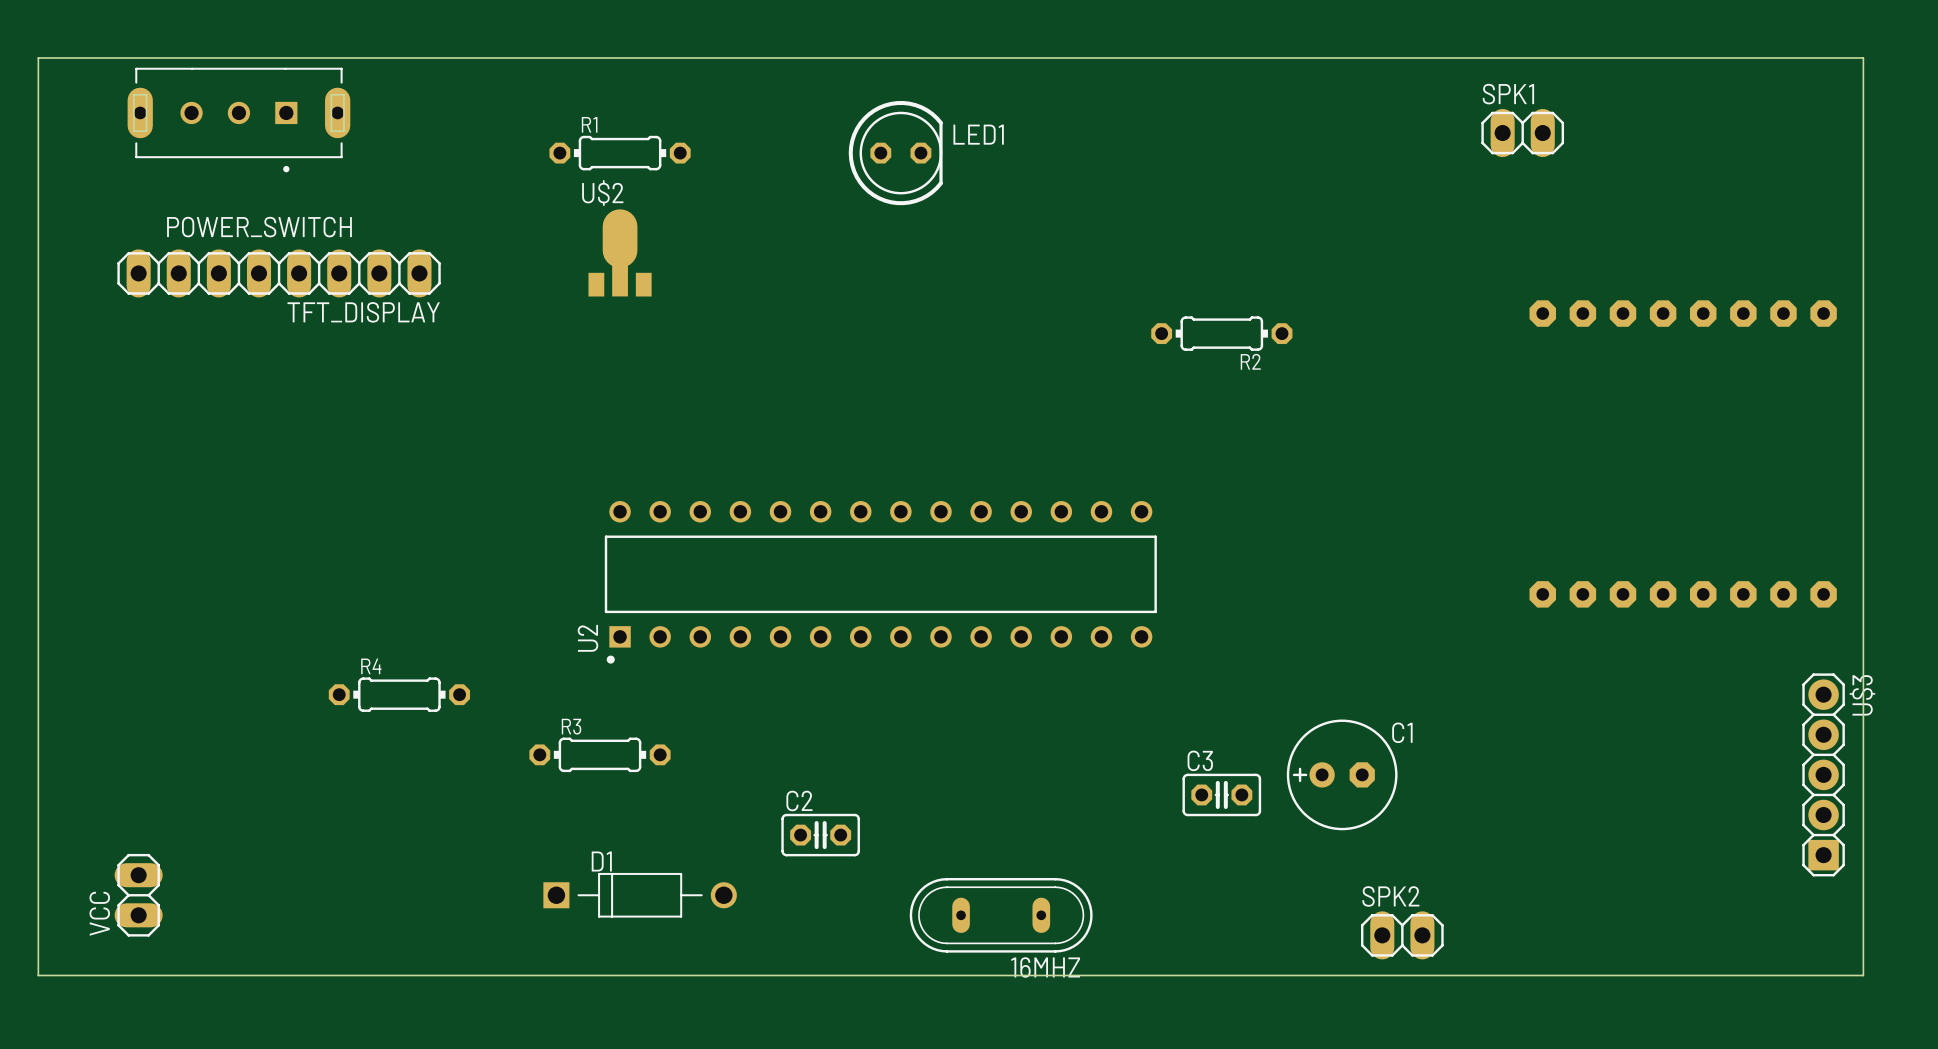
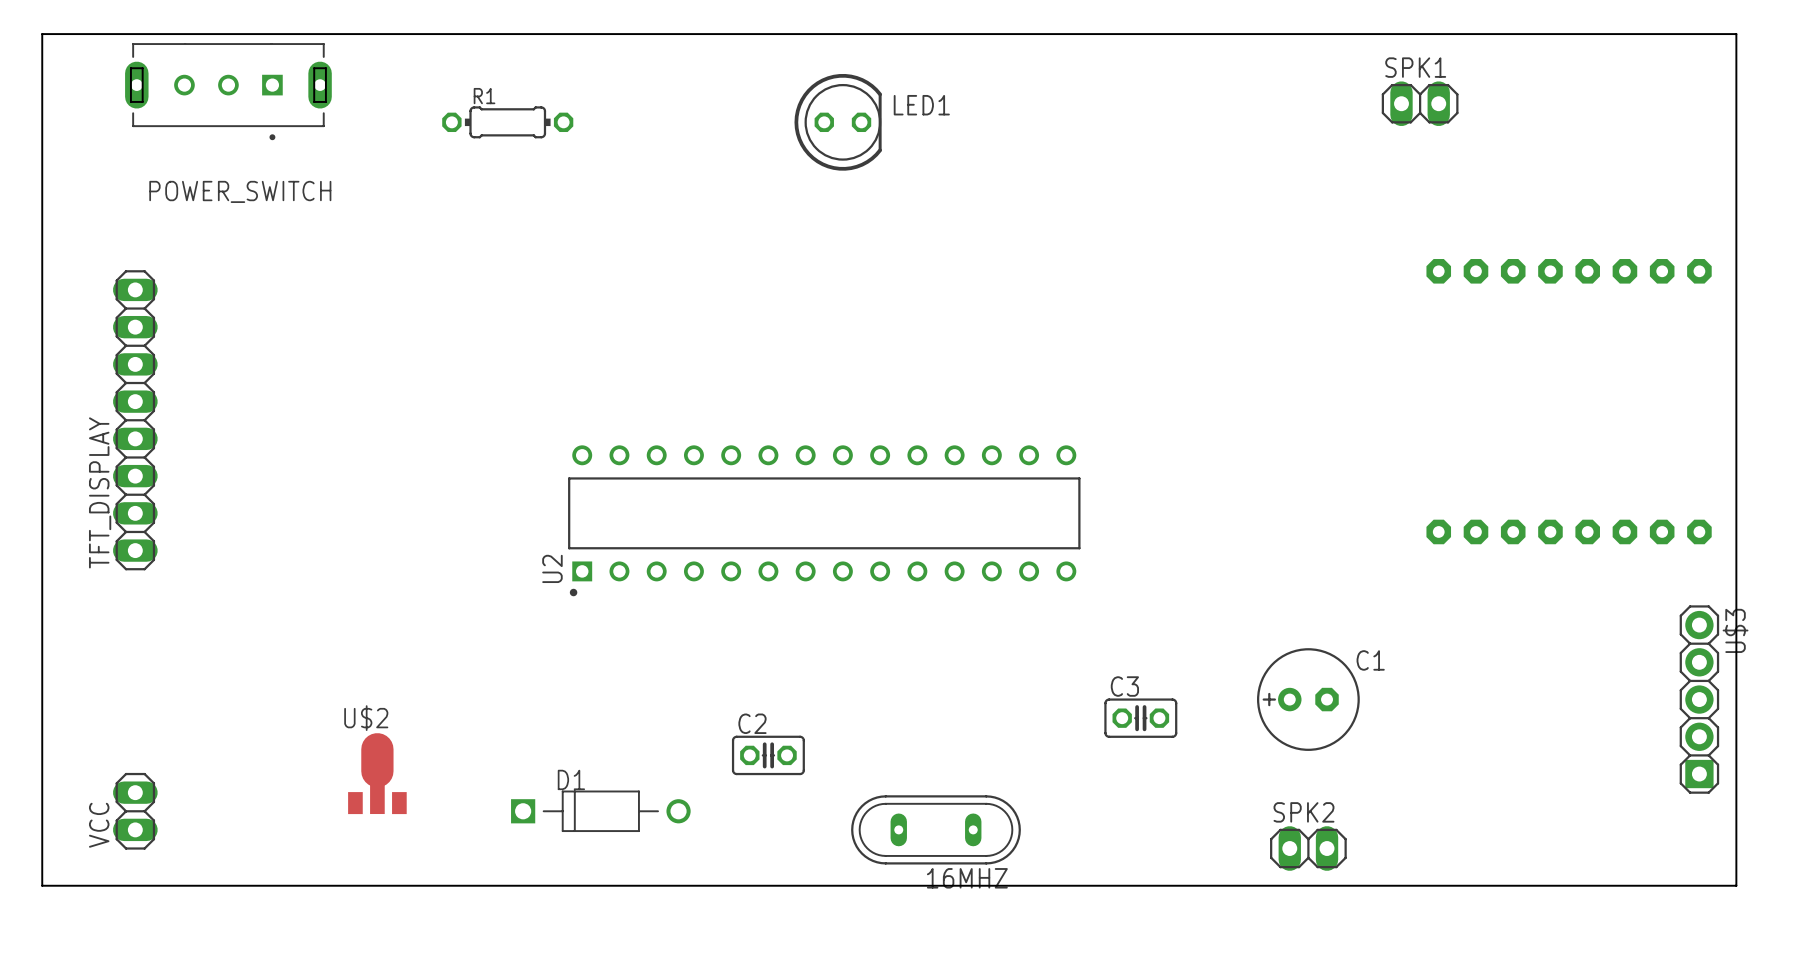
R1 position: (620, 153) -> (507, 122)
U$2 position: (620, 252) -> (377, 773)
TFT_DISPLAY rotation: 0° (279, 273) -> 90° clockwise (135, 420)
TFT_DISPLAY position: (279, 273) -> (135, 420)
R2: (1221, 333) -> none
R4: (399, 694) -> none
R3: (600, 754) -> none
C1 position: (1342, 774) -> (1308, 699)

